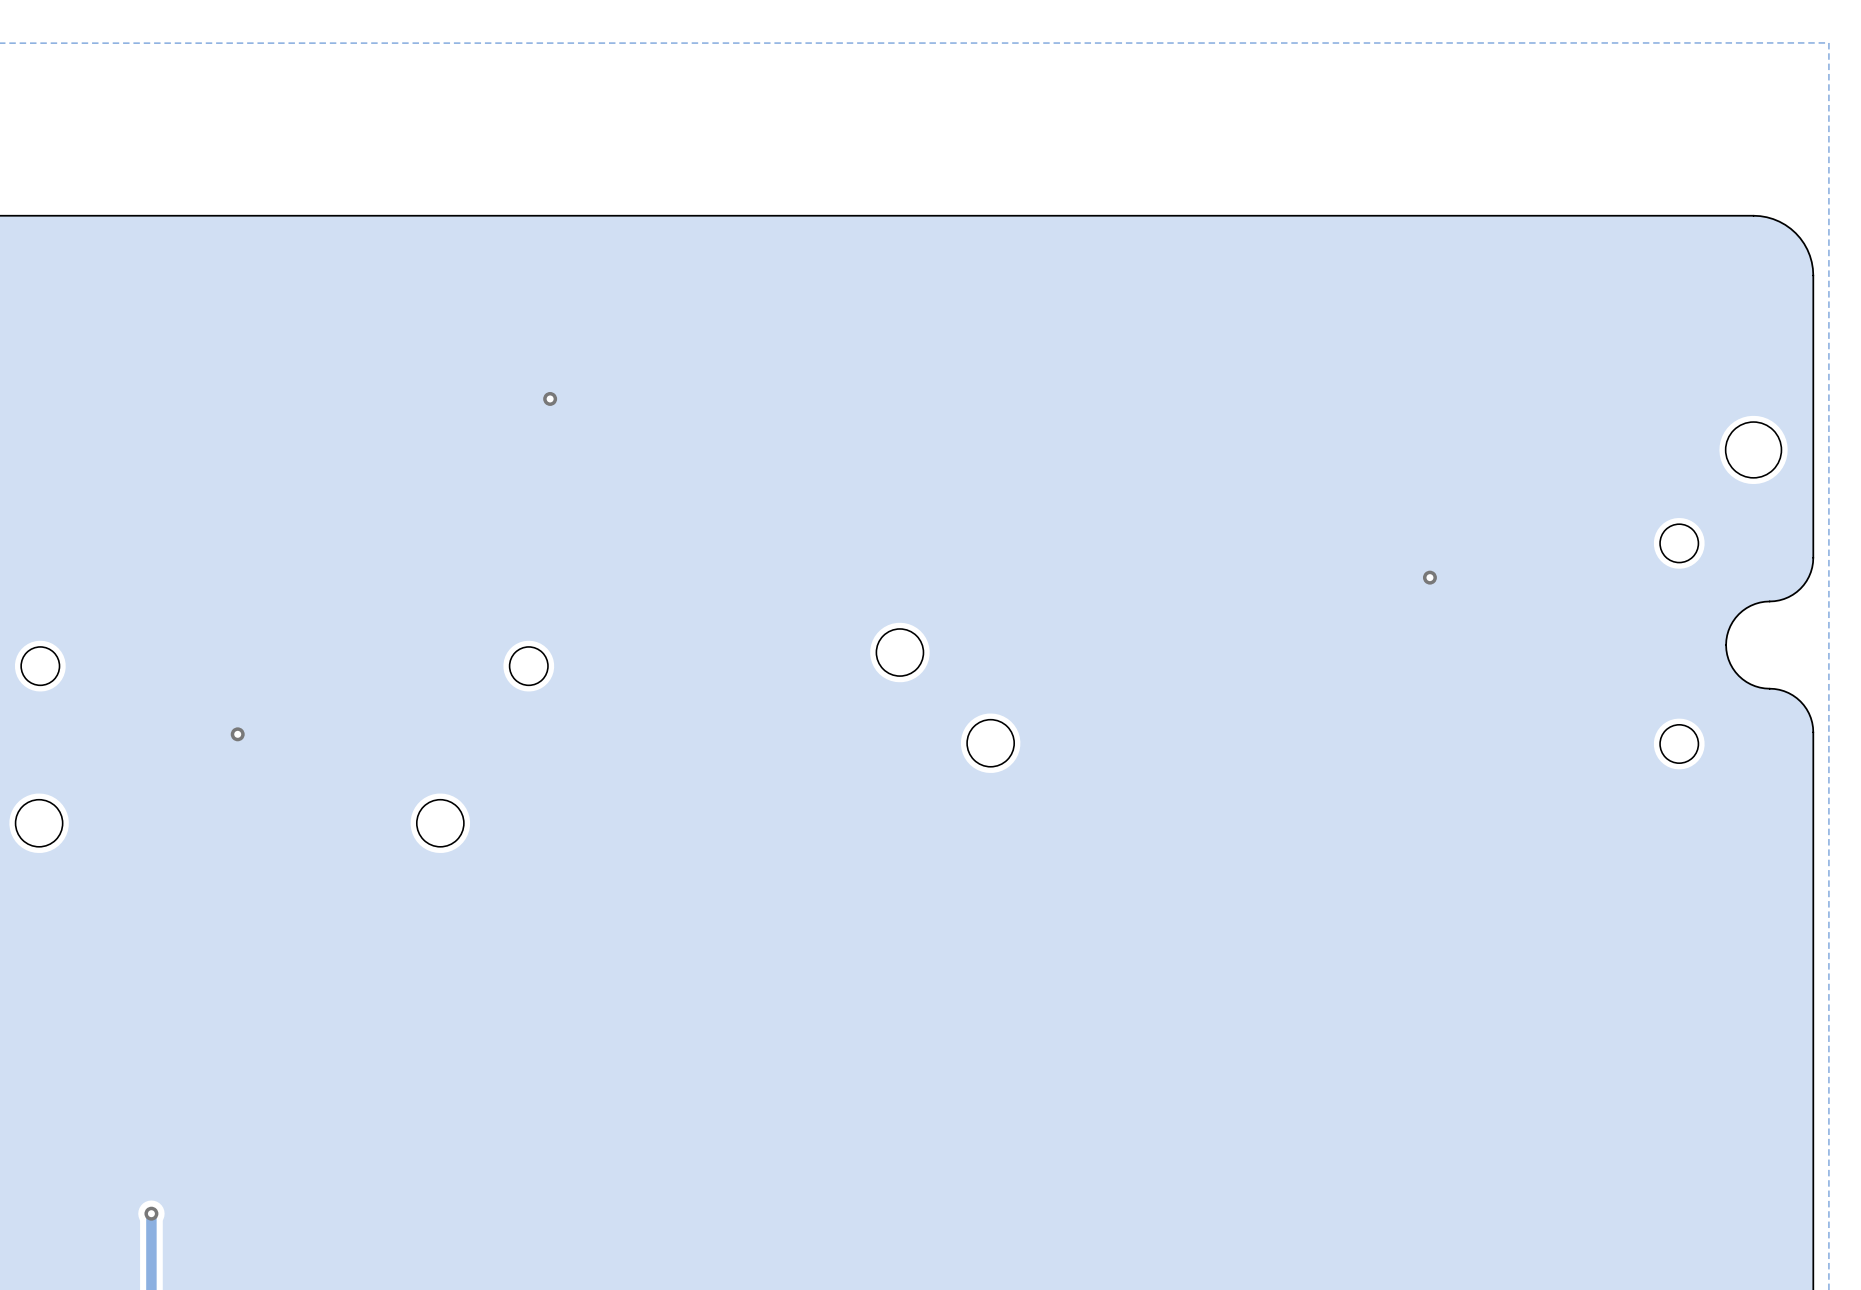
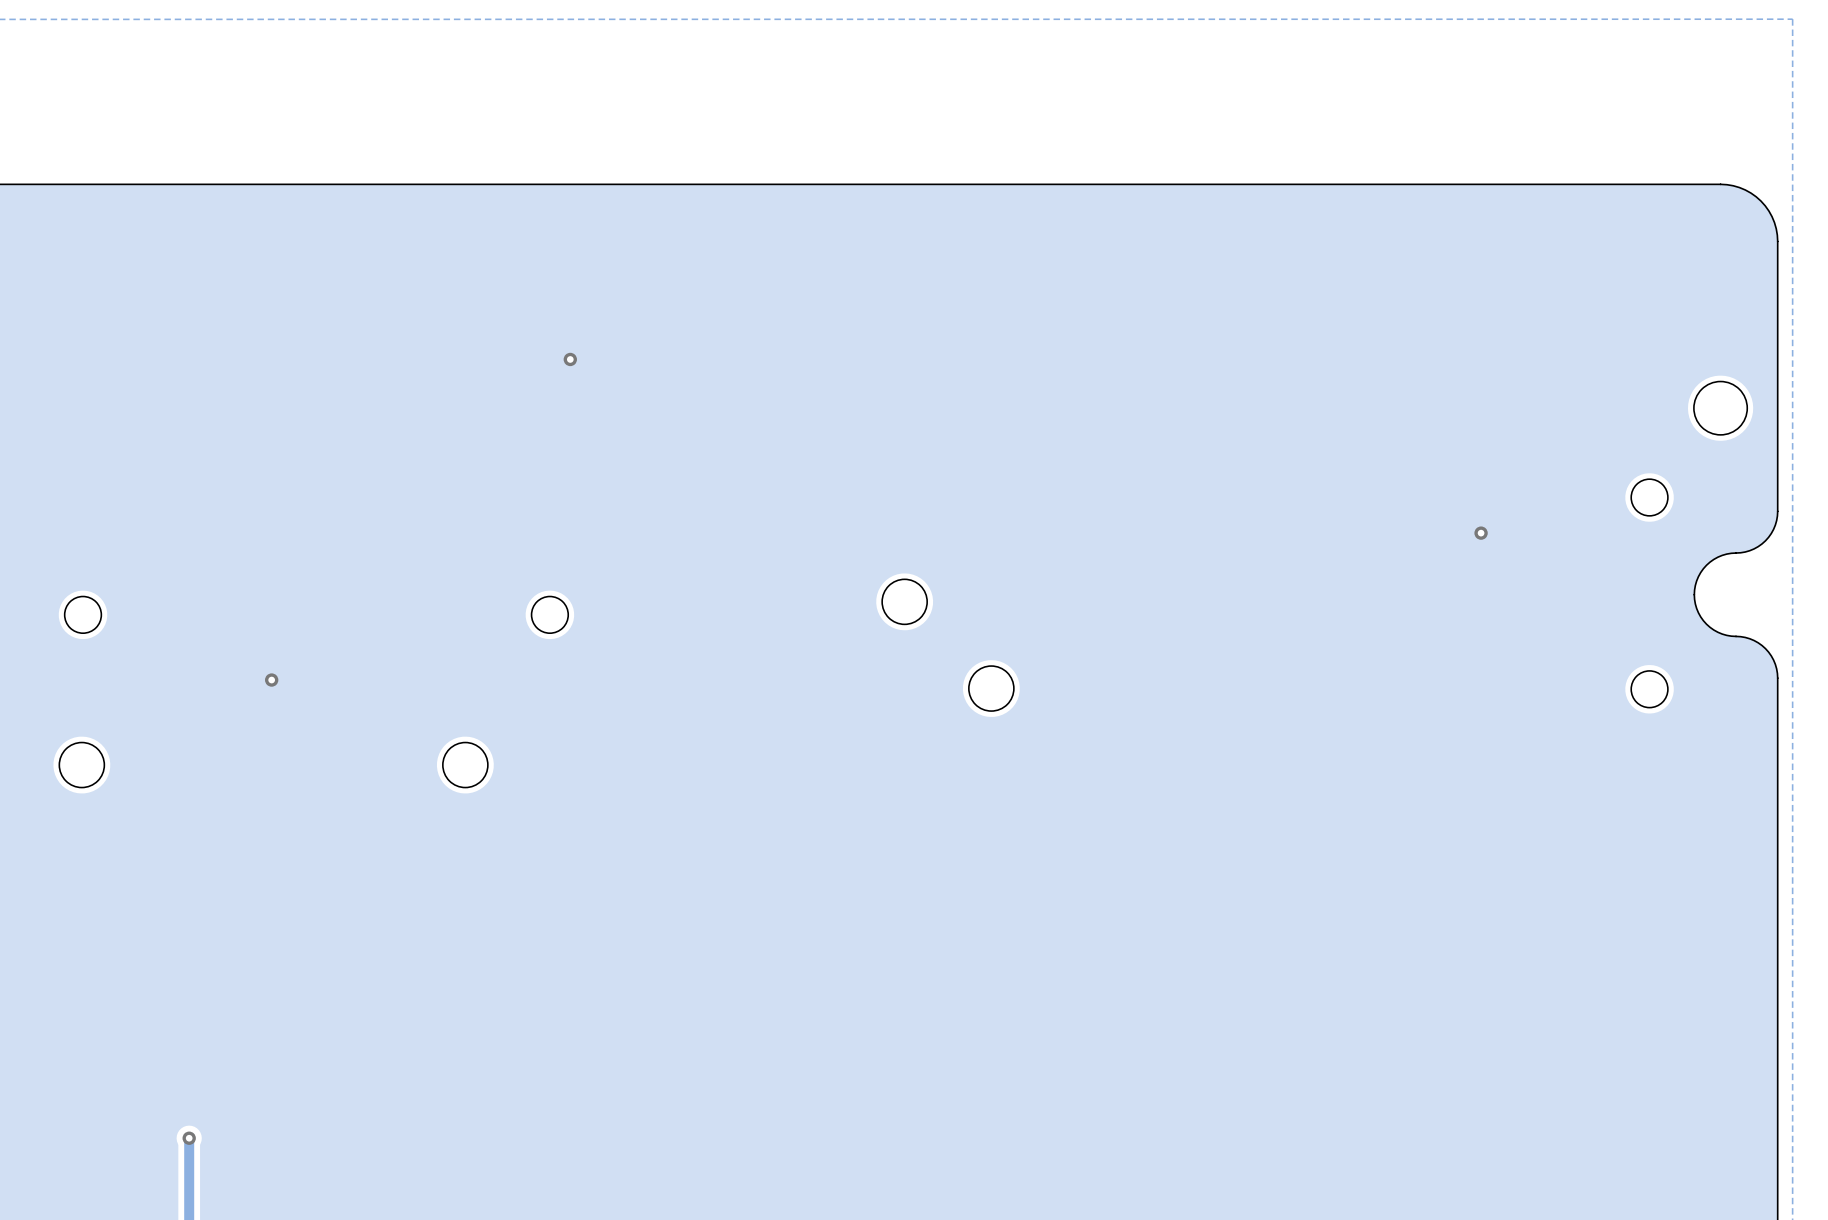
via position: (1429, 577) -> (1481, 533)

